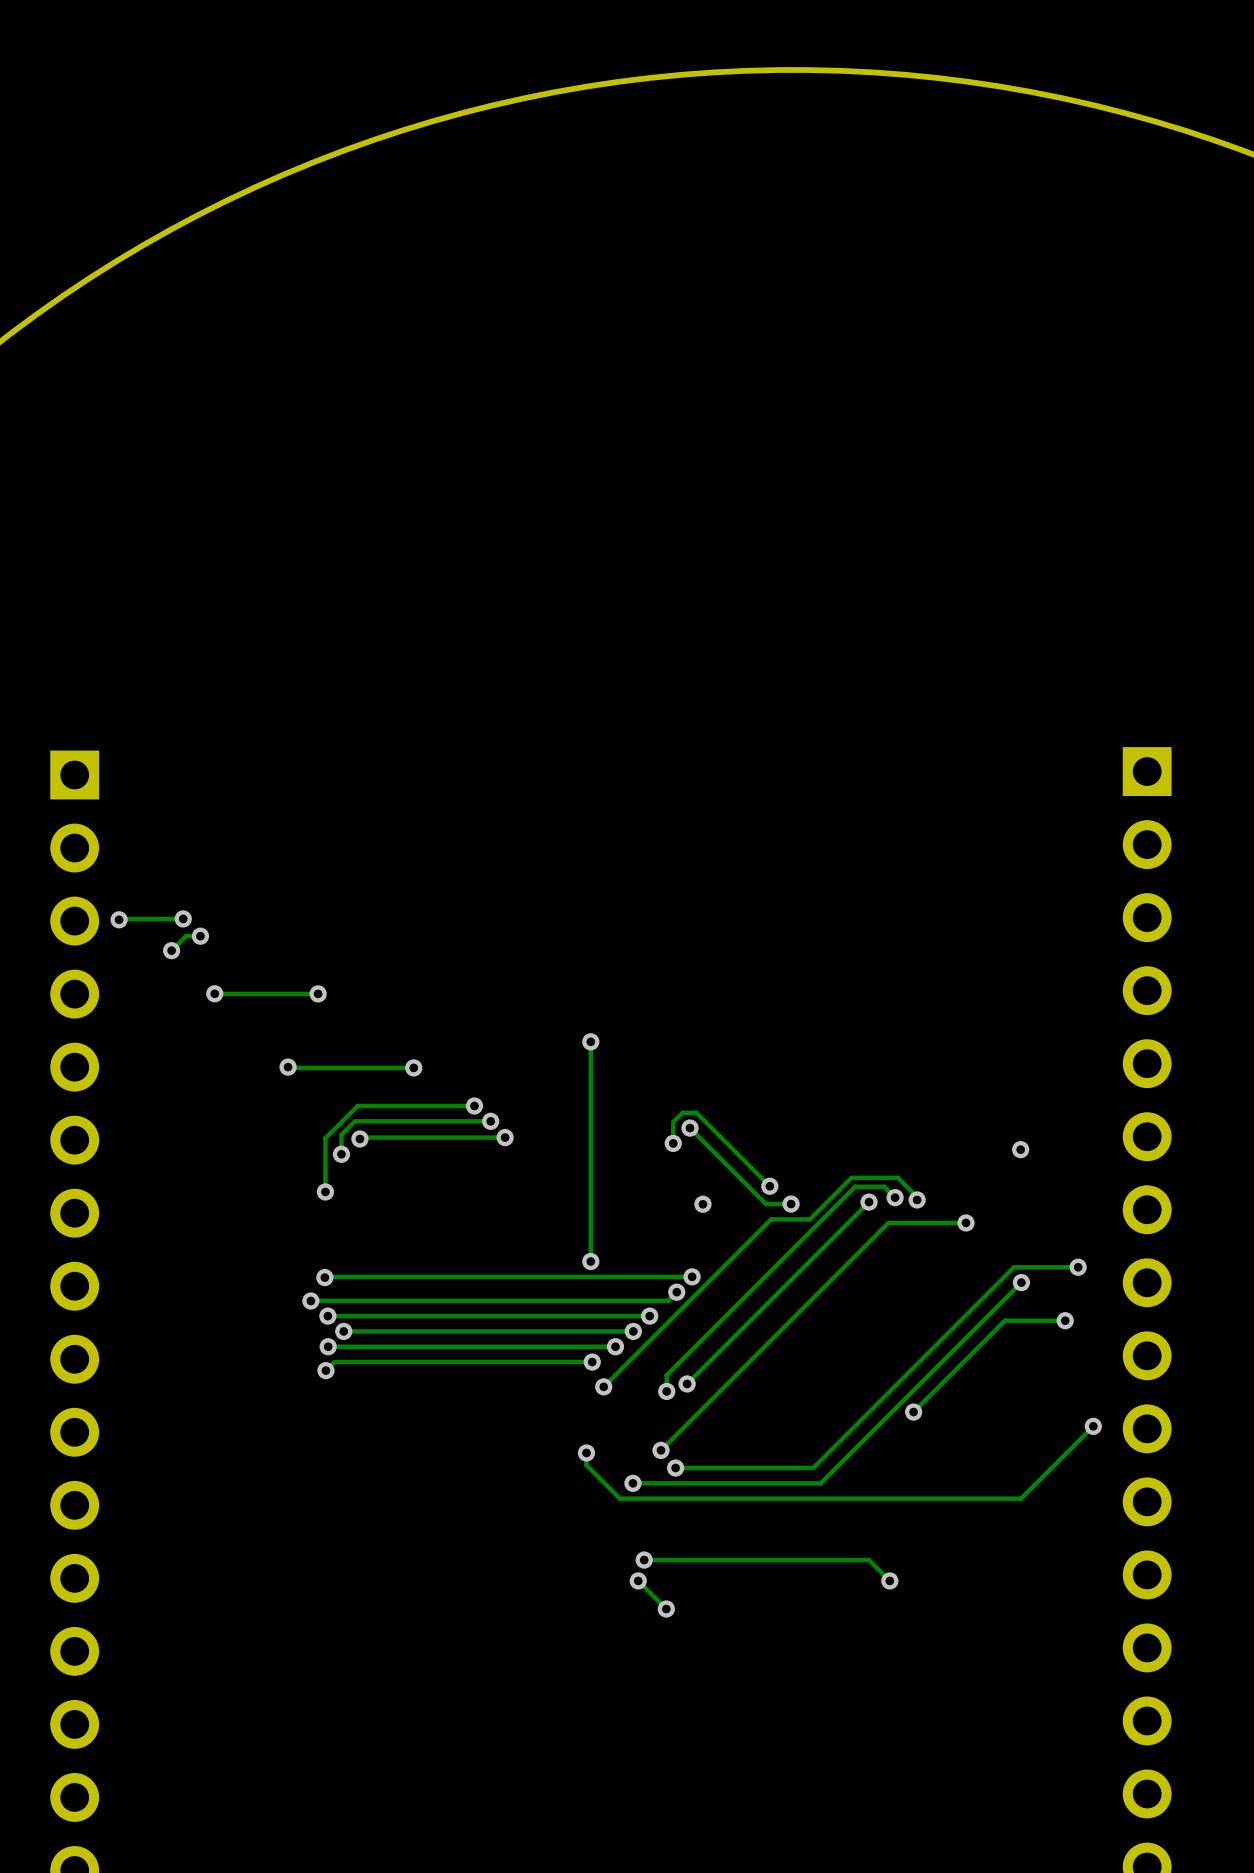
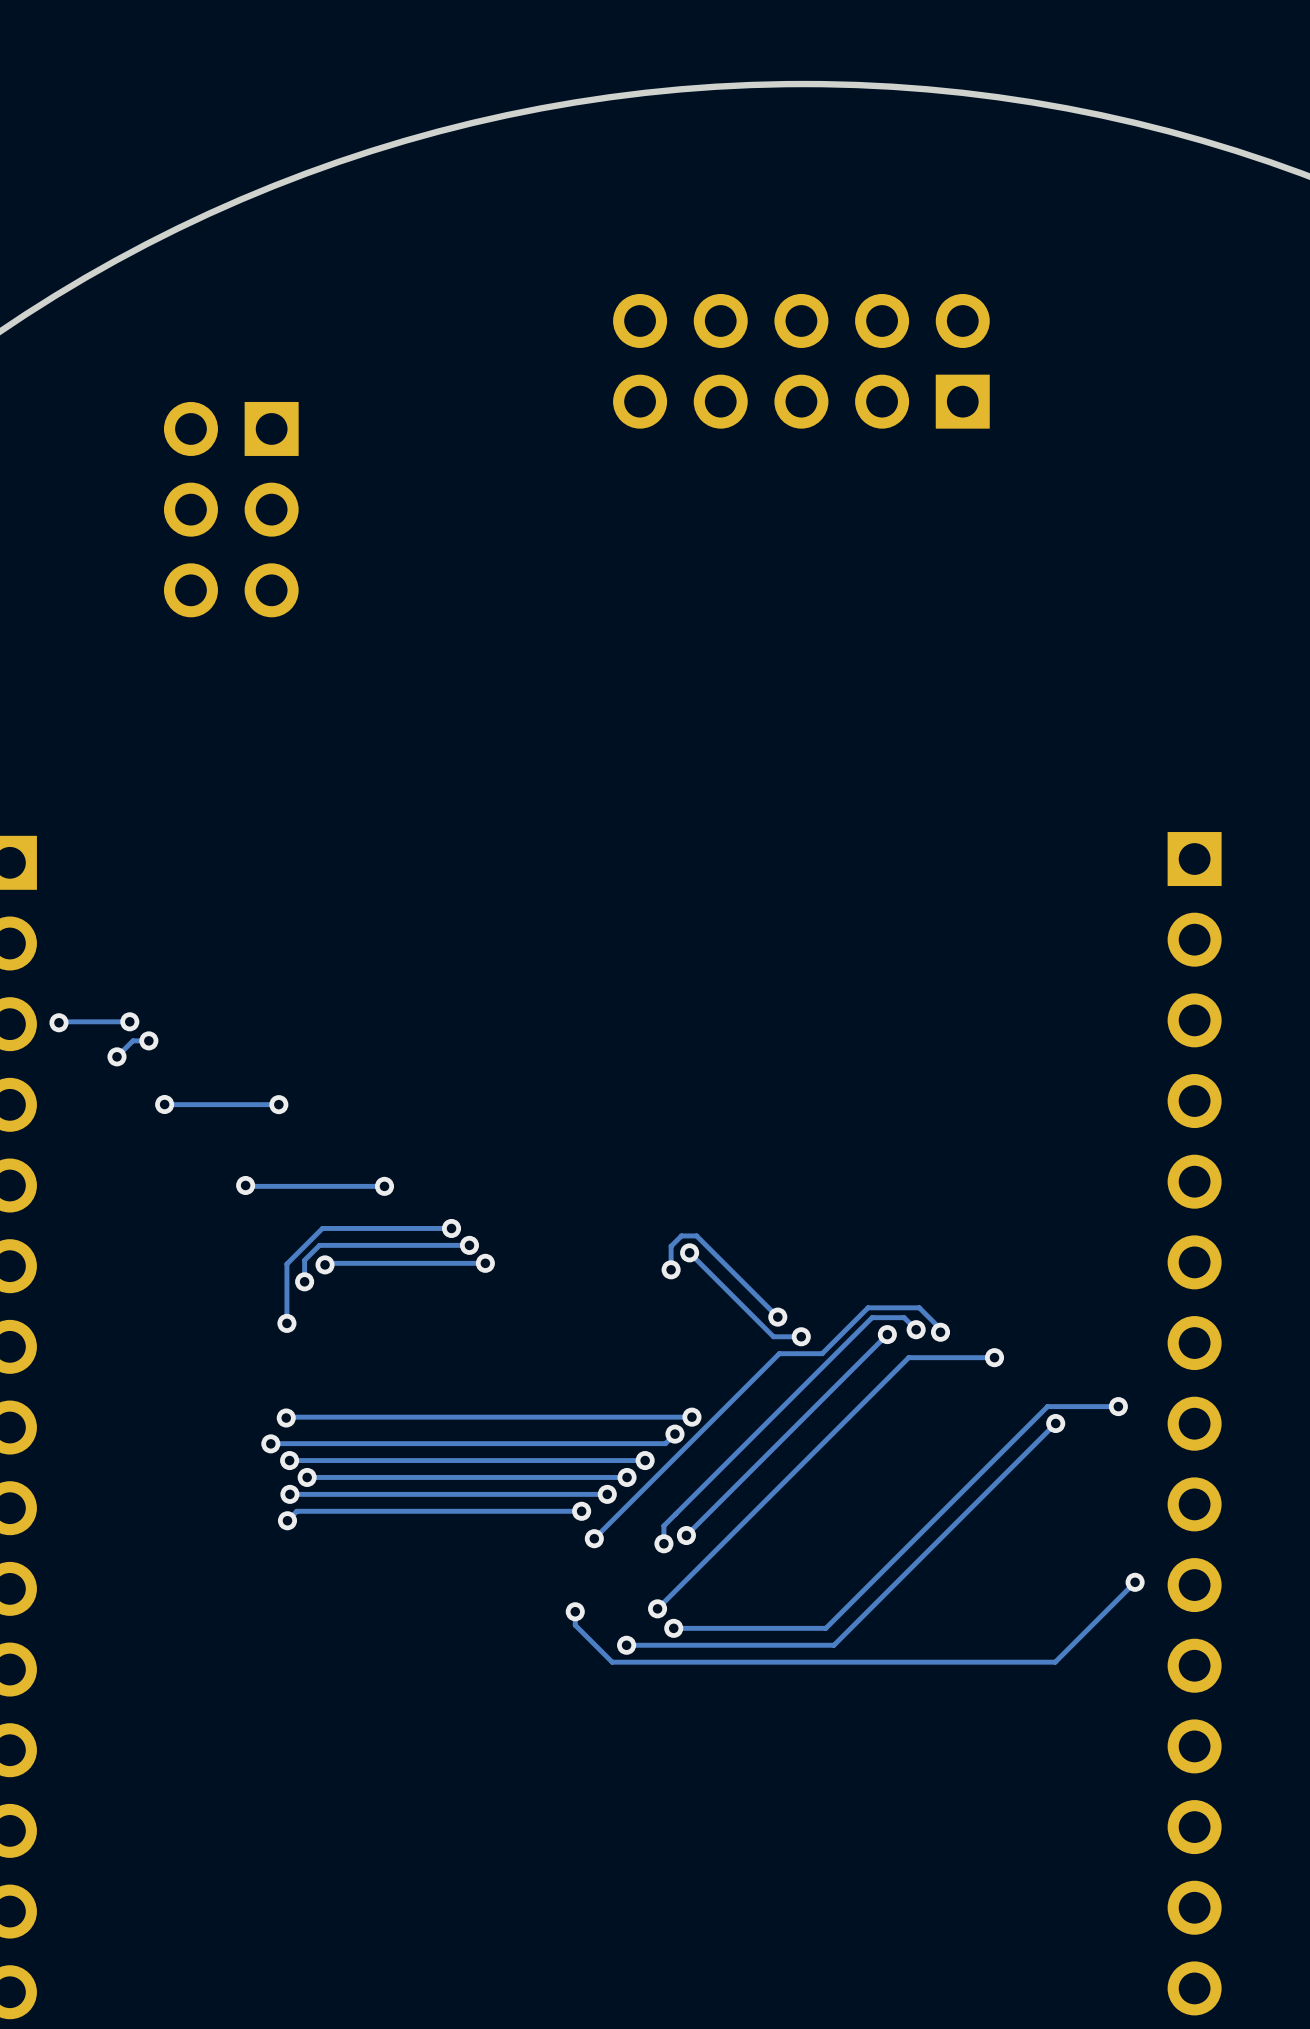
part: none -> (801, 361)
part: none -> (231, 509)
track: (590, 1041) (590, 1261) -> none
via: (590, 1041) -> none
via: (1020, 1149) -> none
via: (702, 1204) -> none
via: (590, 1261) -> none
track: (1065, 1320) (1004, 1320) (913, 1412) -> none
via: (1065, 1320) -> none
via: (913, 1412) -> none
track: (644, 1560) (868, 1560) (889, 1580) -> none
via: (644, 1560) -> none
track: (638, 1580) (666, 1609) -> none
via: (638, 1580) -> none
via: (889, 1580) -> none
via: (666, 1609) -> none

